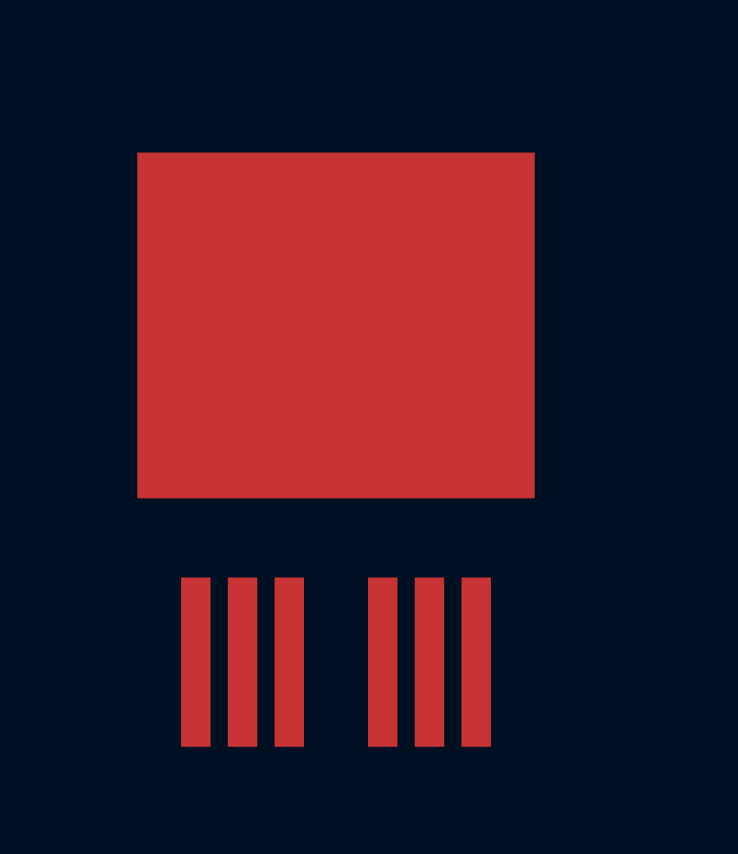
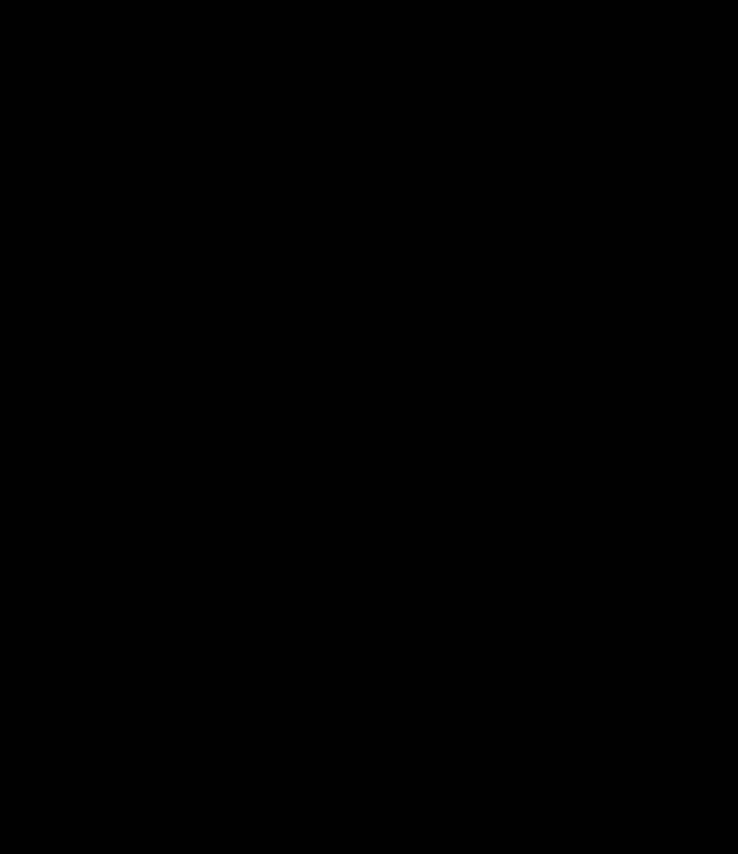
part: (336, 449) -> none

